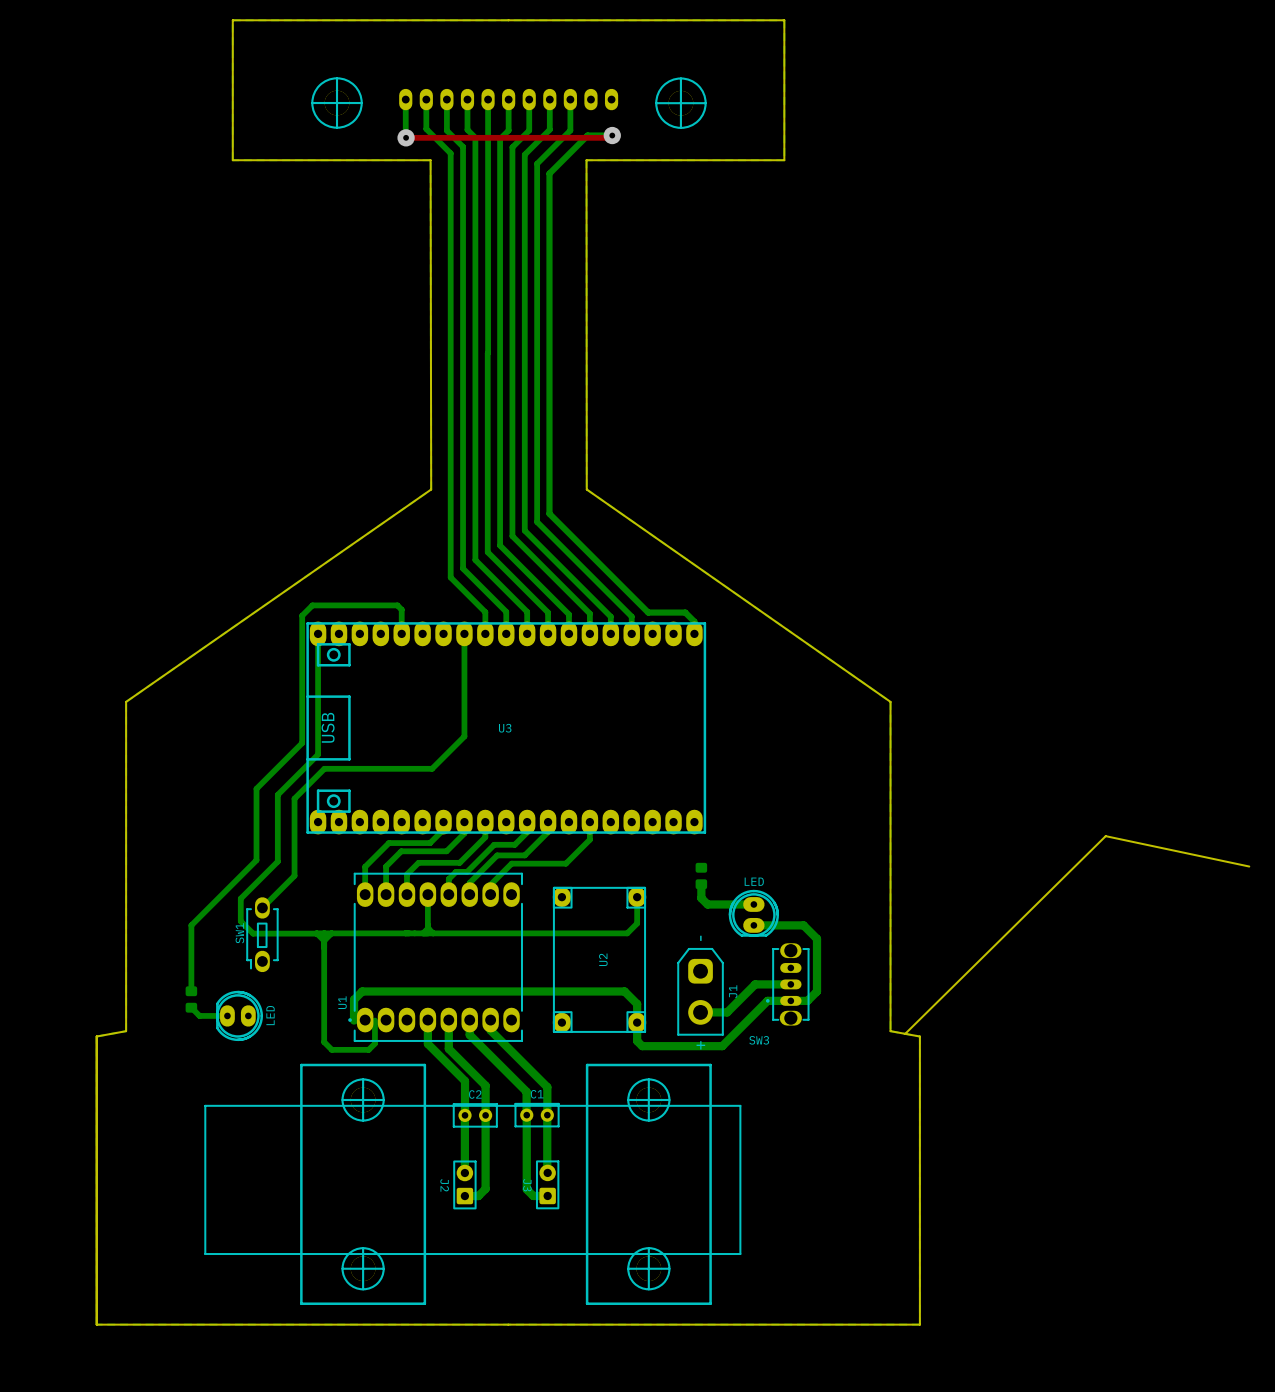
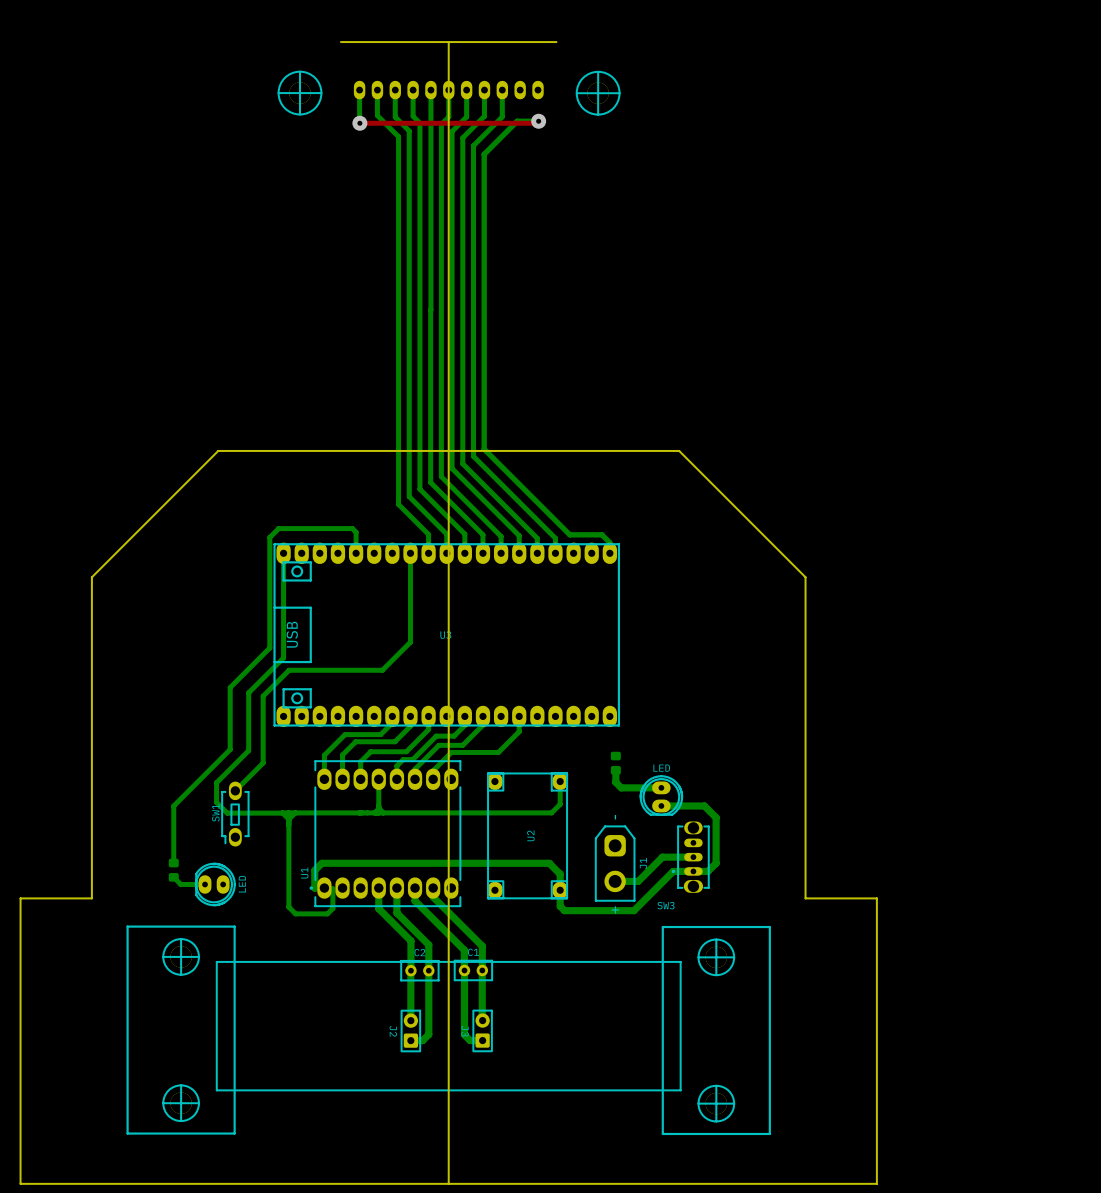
board edge: (232, 20) (784, 20) (784, 160) (586, 160) (586, 489) (890, 701) (890, 1031) (919, 1036) (919, 1324) (96, 1324) (96, 1036) (126, 1031) (126, 701) (431, 489) (430, 160) (232, 160) (232, 20) -> (218, 450) (91, 577) (91, 898) (20, 898) (20, 1183) (876, 1183) (876, 898) (805, 898) (805, 577) (679, 450) (218, 450)
board edge: none -> (340, 42) (556, 42)
board edge: none -> (448, 42) (448, 1183)
board edge: (1249, 866) (1105, 836) (905, 1033) -> none
line: (205, 1105) (740, 1105) (740, 1254) (205, 1254) (205, 1105) -> (216, 961) (680, 961) (680, 1090) (216, 1090) (216, 961)
part position: (363, 1184) -> (181, 1030)
part position: (648, 1184) -> (716, 1030)

